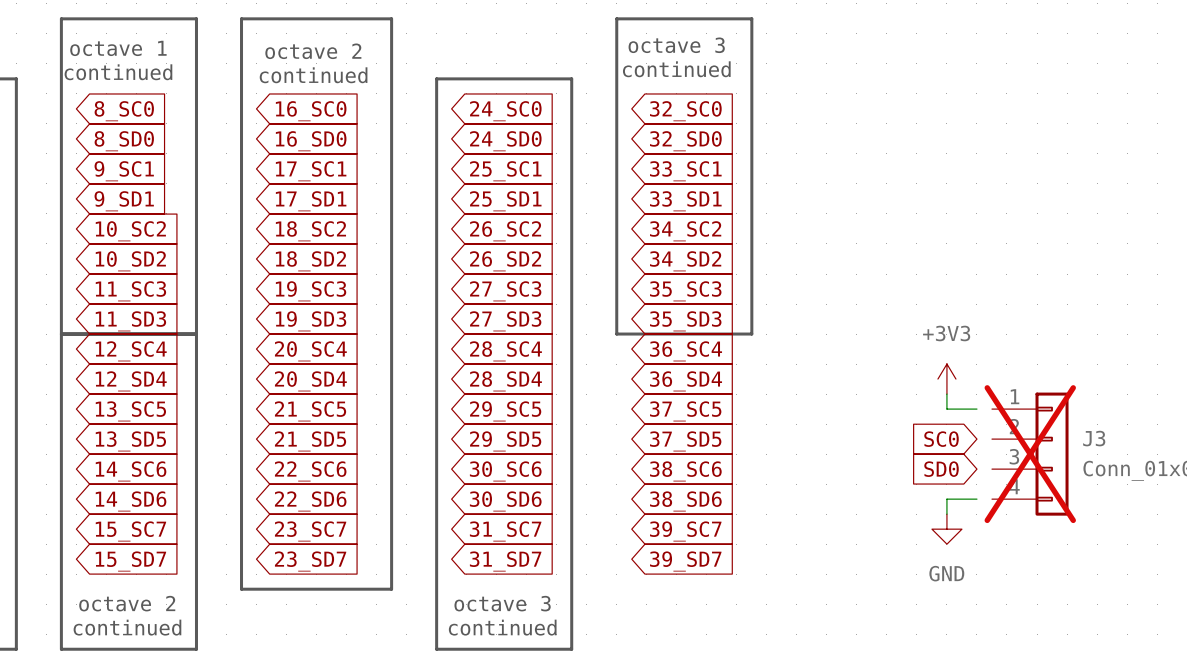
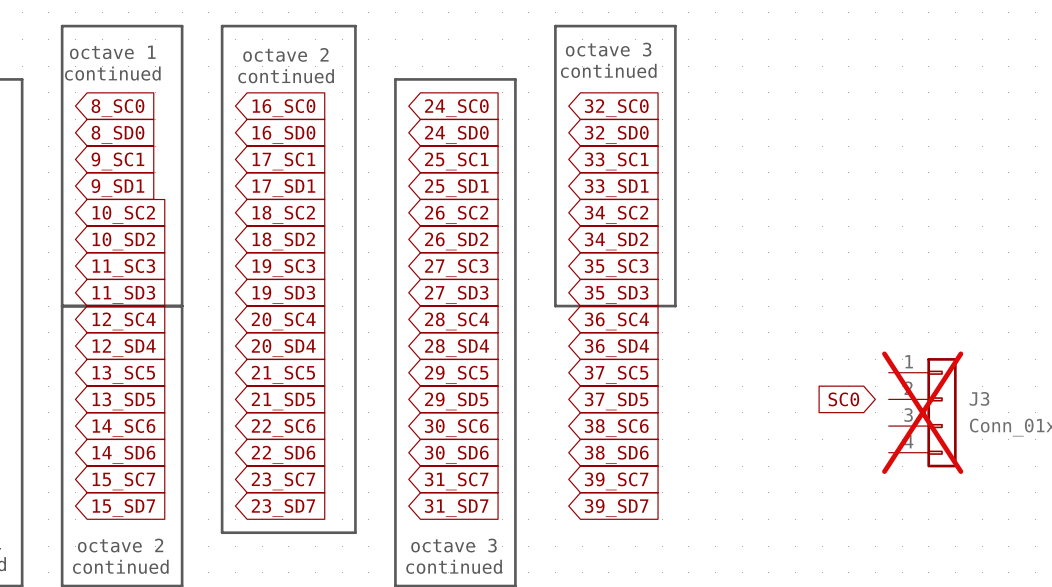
power symbol: +3V3 (946, 379) -> none
wire: (946, 394) (946, 409) (976, 409) -> none
global label: SD0 (941, 469) -> none
wire: (976, 499) (946, 499) (946, 514) -> none
power symbol: GND (946, 529) -> none

